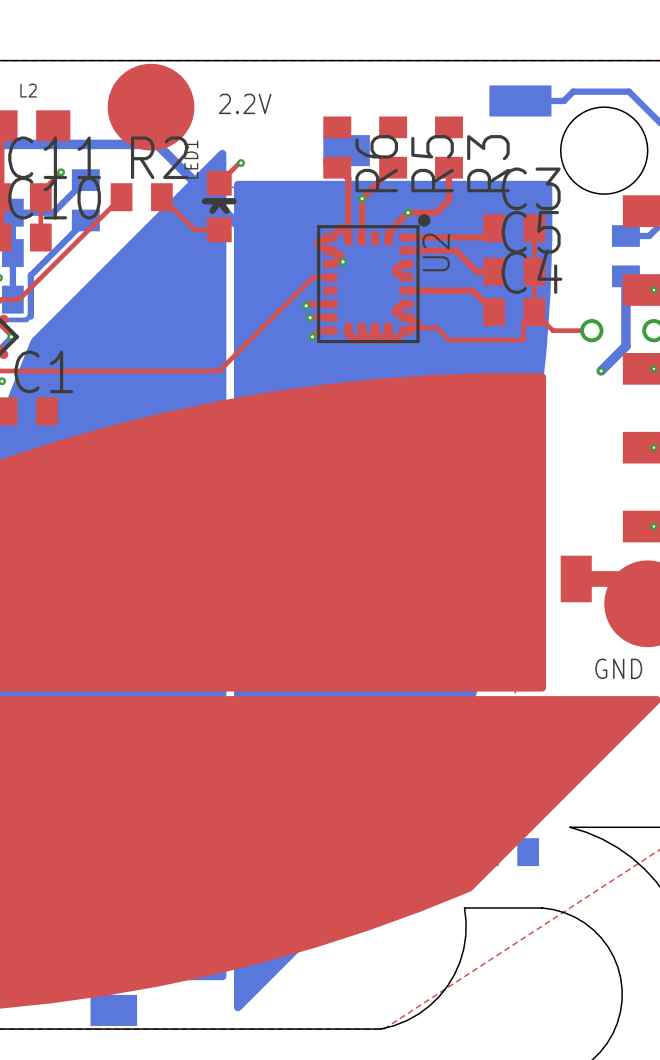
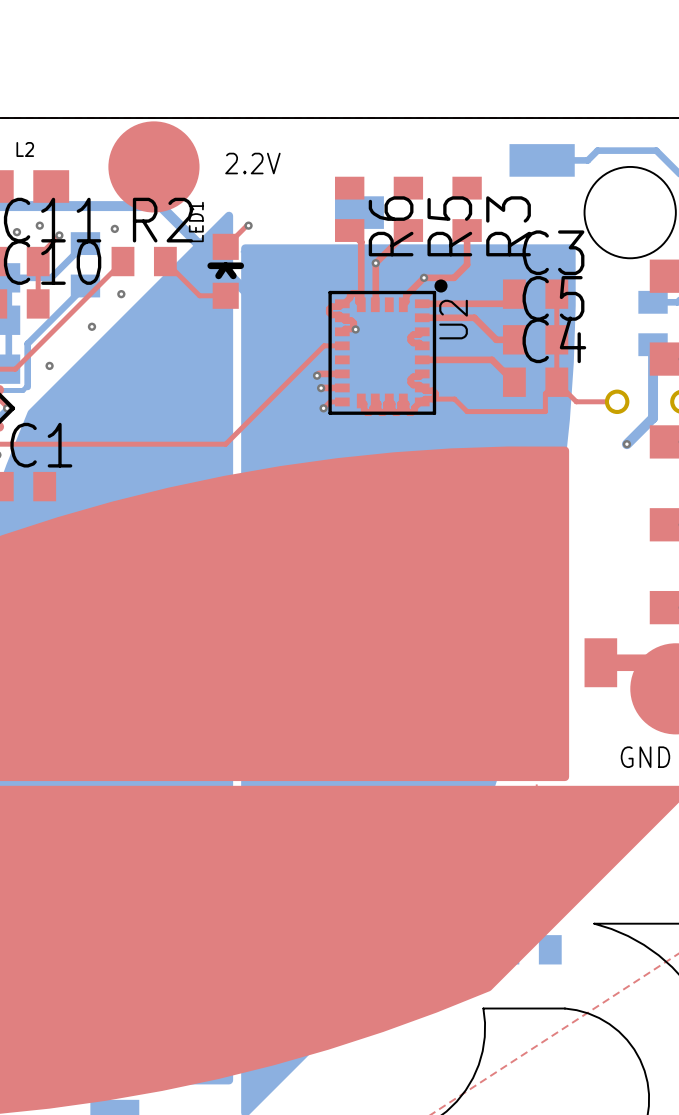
via: none -> (39, 225)
via: none -> (114, 228)
via: none -> (16, 232)
via: none -> (121, 294)
via: none -> (91, 326)
via: none -> (49, 365)

